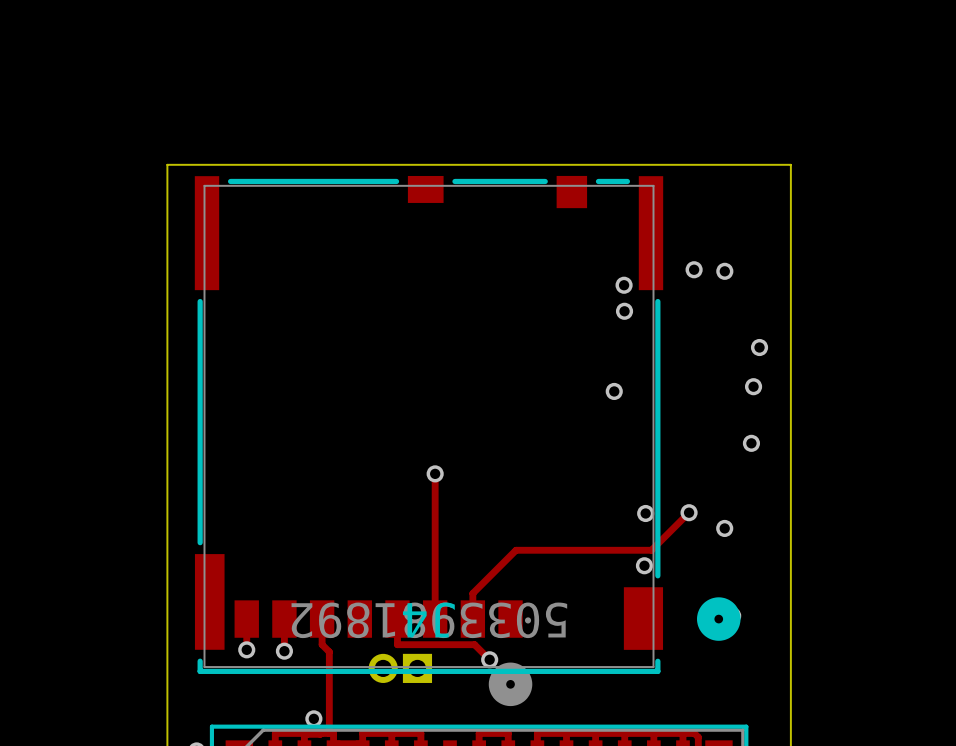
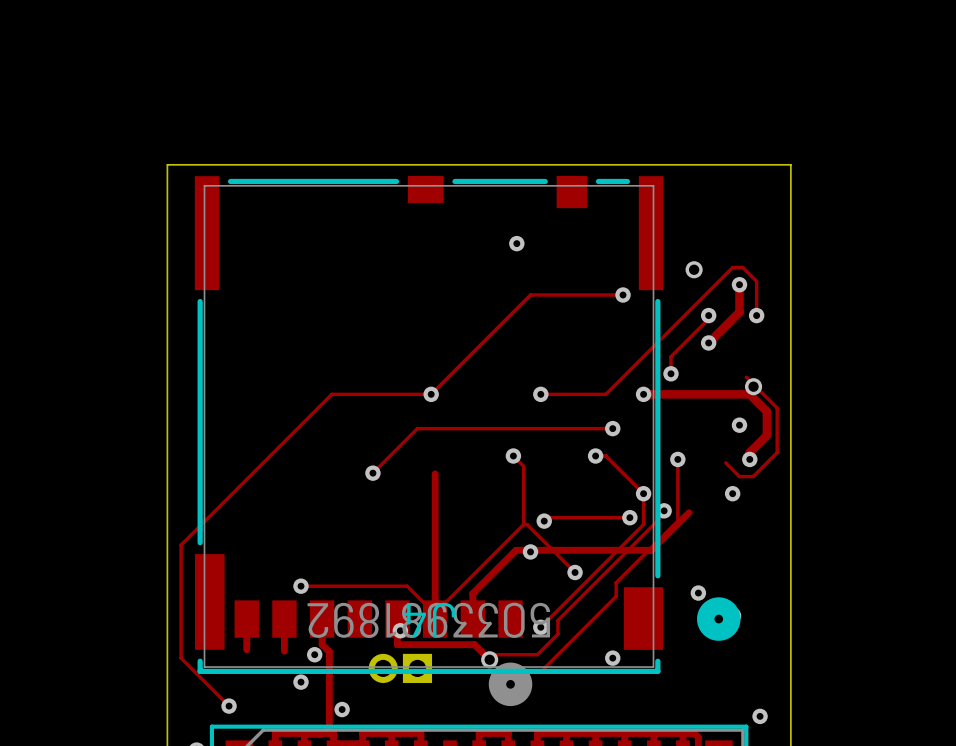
via: none -> (516, 243)
via position: (724, 271) -> (739, 284)
track: none -> (739, 284) (739, 312) (708, 342)
via: (624, 285) -> none
track: none -> (623, 295) (530, 295) (431, 394) (331, 394) (181, 545) (181, 658) (229, 706)
via: none -> (623, 295)
via: (624, 311) -> none
via: none -> (708, 315)
track: none -> (756, 315) (756, 281) (742, 267) (732, 267) (605, 394) (540, 394)
via: none -> (756, 315)
track: none -> (708, 318) (670, 356) (670, 373)
via: none -> (708, 342)
via: (759, 347) -> none
via: none -> (670, 373)
track: none -> (746, 377) (777, 408) (777, 452) (753, 476) (739, 476) (725, 462)
via: (614, 391) -> none
via: none -> (431, 394)
via: none -> (540, 394)
track: none -> (643, 394) (749, 394) (766, 411) (766, 435) (749, 452) (749, 459)
via: none -> (643, 394)
via: none -> (739, 425)
track: none -> (612, 428) (417, 428) (372, 473)
via: none -> (612, 428)
via position: (751, 443) -> (749, 459)
track: none -> (513, 456) (523, 466) (523, 524)
via: none -> (513, 456)
track: none -> (595, 456) (605, 456) (643, 493) (643, 524) (540, 627)
via: none -> (595, 456)
track: none -> (677, 459) (677, 521) (616, 582) (616, 596) (544, 668)
via: none -> (677, 459)
via: none -> (372, 473)
via: (435, 473) -> none
via: none -> (643, 493)
via: none -> (732, 493)
track: none -> (664, 510) (664, 514) (557, 620) (557, 634) (537, 654) (482, 654)
via: none -> (664, 510)
via: (689, 512) -> none
via position: (645, 513) -> (629, 517)
track: none -> (629, 517) (547, 517) (544, 521)
via: none -> (544, 521)
track: none -> (523, 524) (527, 524) (575, 572)
track: none -> (523, 524) (434, 613) (407, 586) (301, 586)
via: (724, 528) -> none
via: none -> (530, 551)
via: (644, 565) -> none
via: none -> (575, 572)
via: none -> (301, 586)
via: none -> (698, 593)
via: none -> (540, 627)
via: none -> (400, 630)
via: (246, 649) -> none
via: (284, 651) -> none
via: none -> (314, 654)
via: none -> (612, 658)
via: none -> (301, 682)
via: none -> (229, 706)
via: none -> (342, 709)
via: none -> (760, 716)
via: (313, 718) -> none

